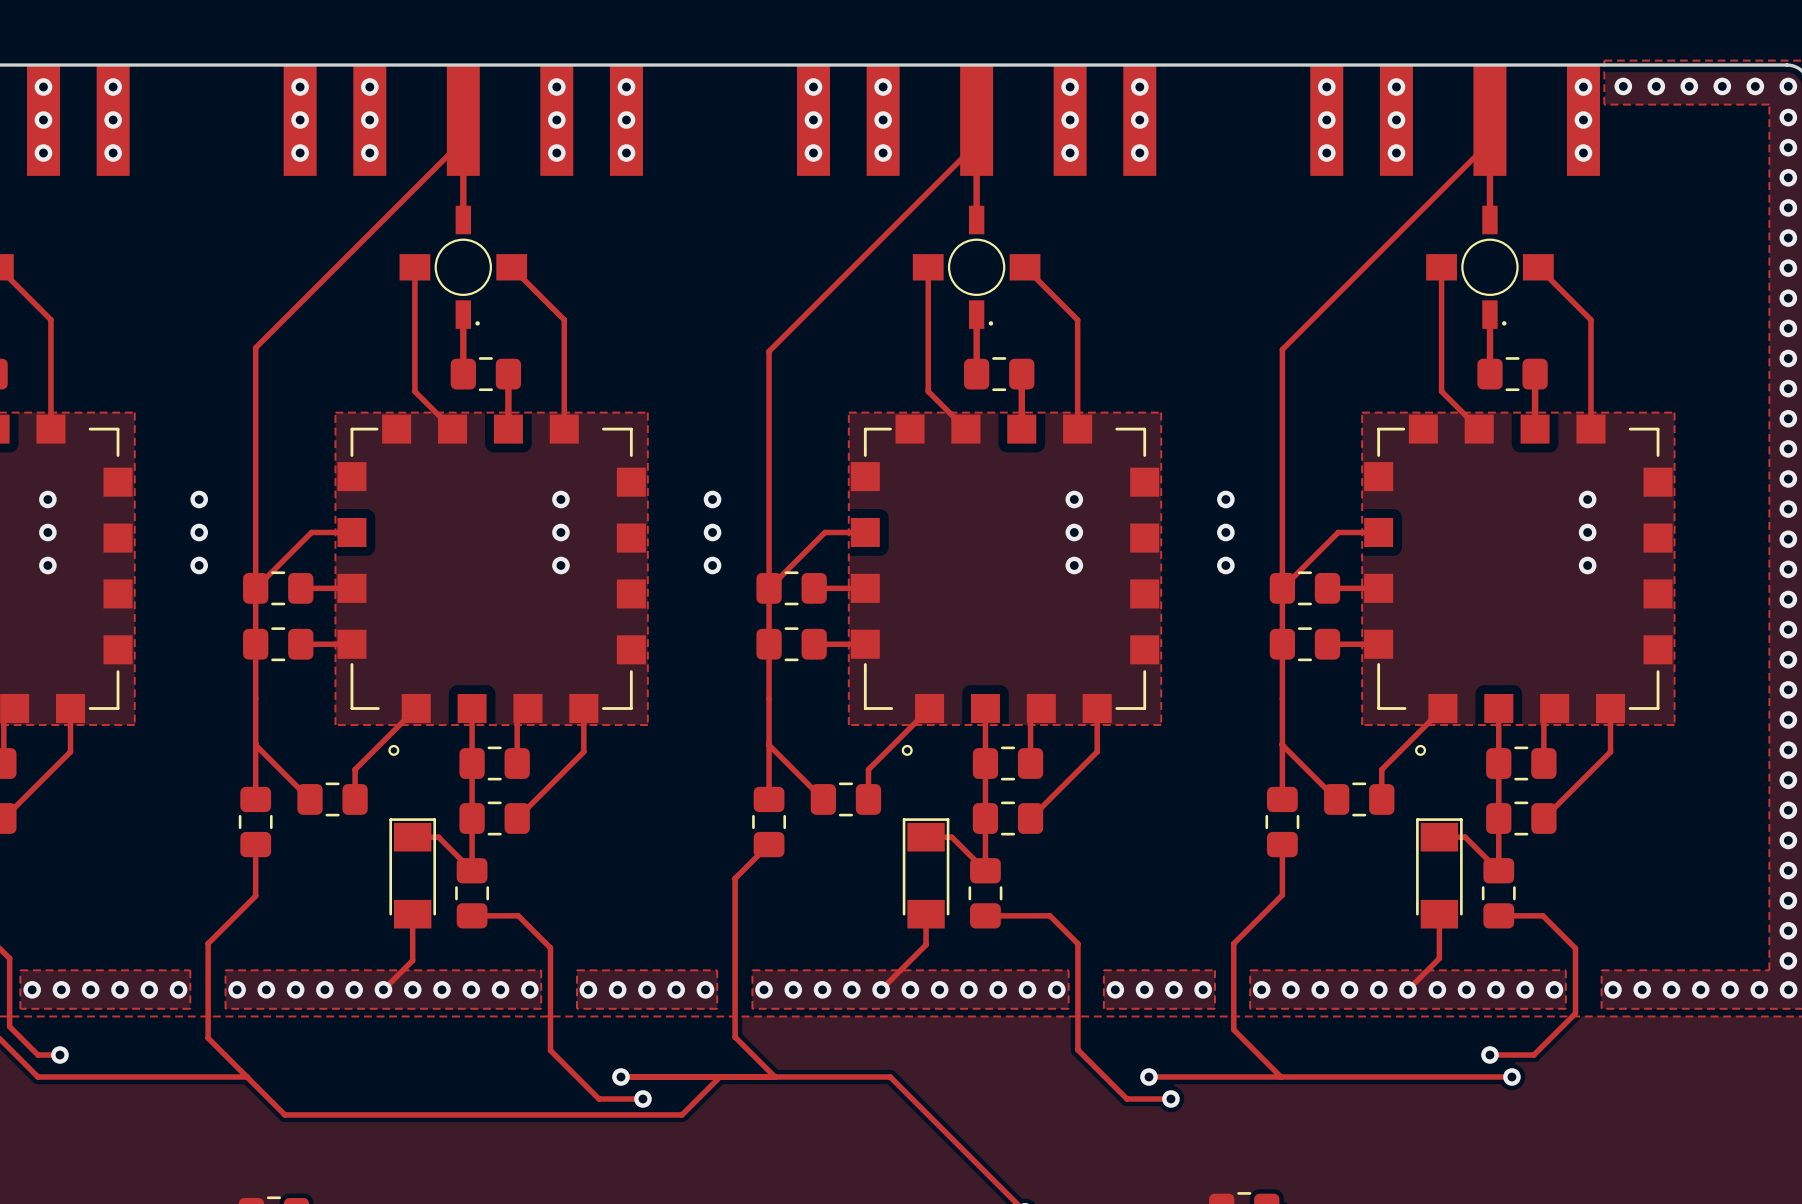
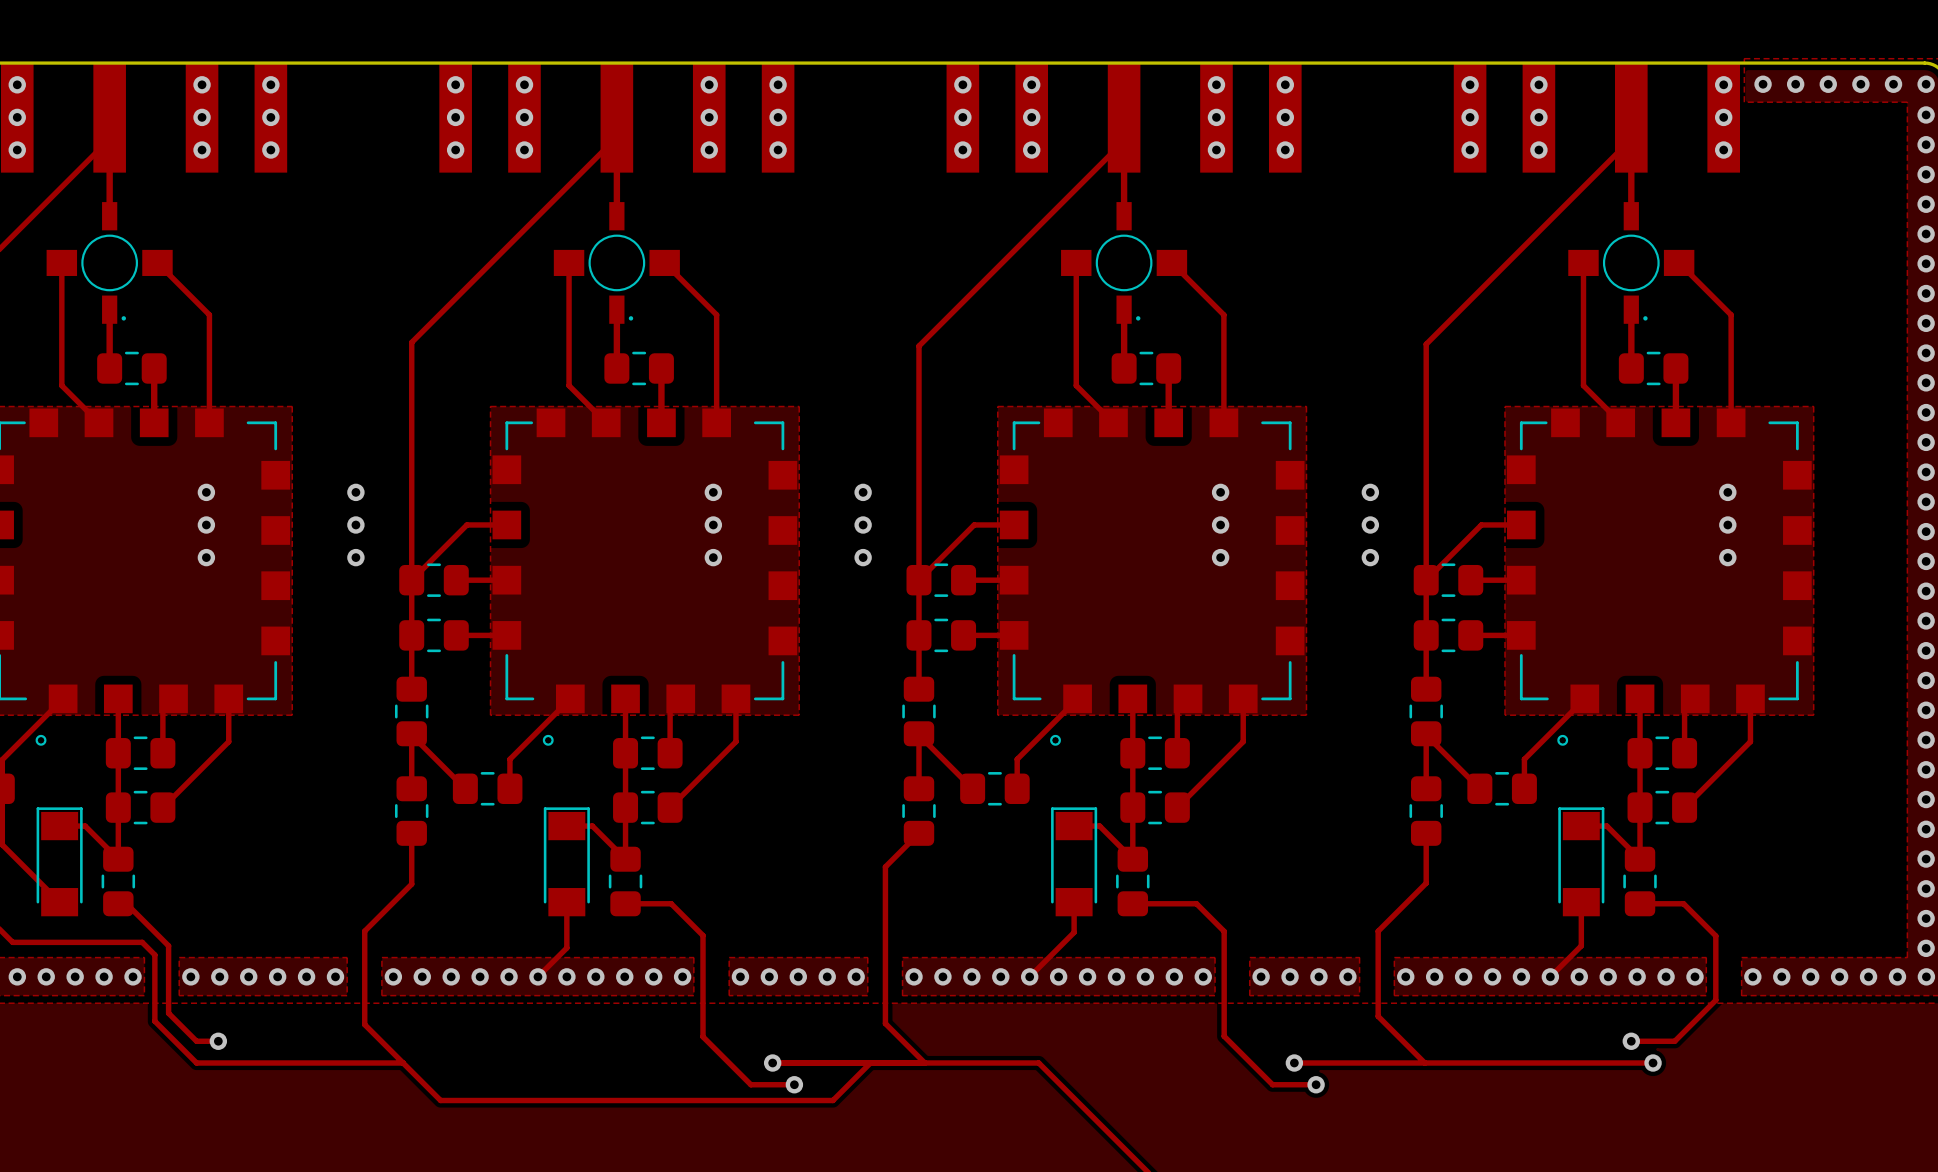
track: (255, 698) (255, 743) -> none
track: (769, 698) (769, 743) -> none
track: (1282, 698) (1282, 743) -> none
part: none -> (411, 711)
part: none -> (918, 711)
part: none -> (1426, 711)

